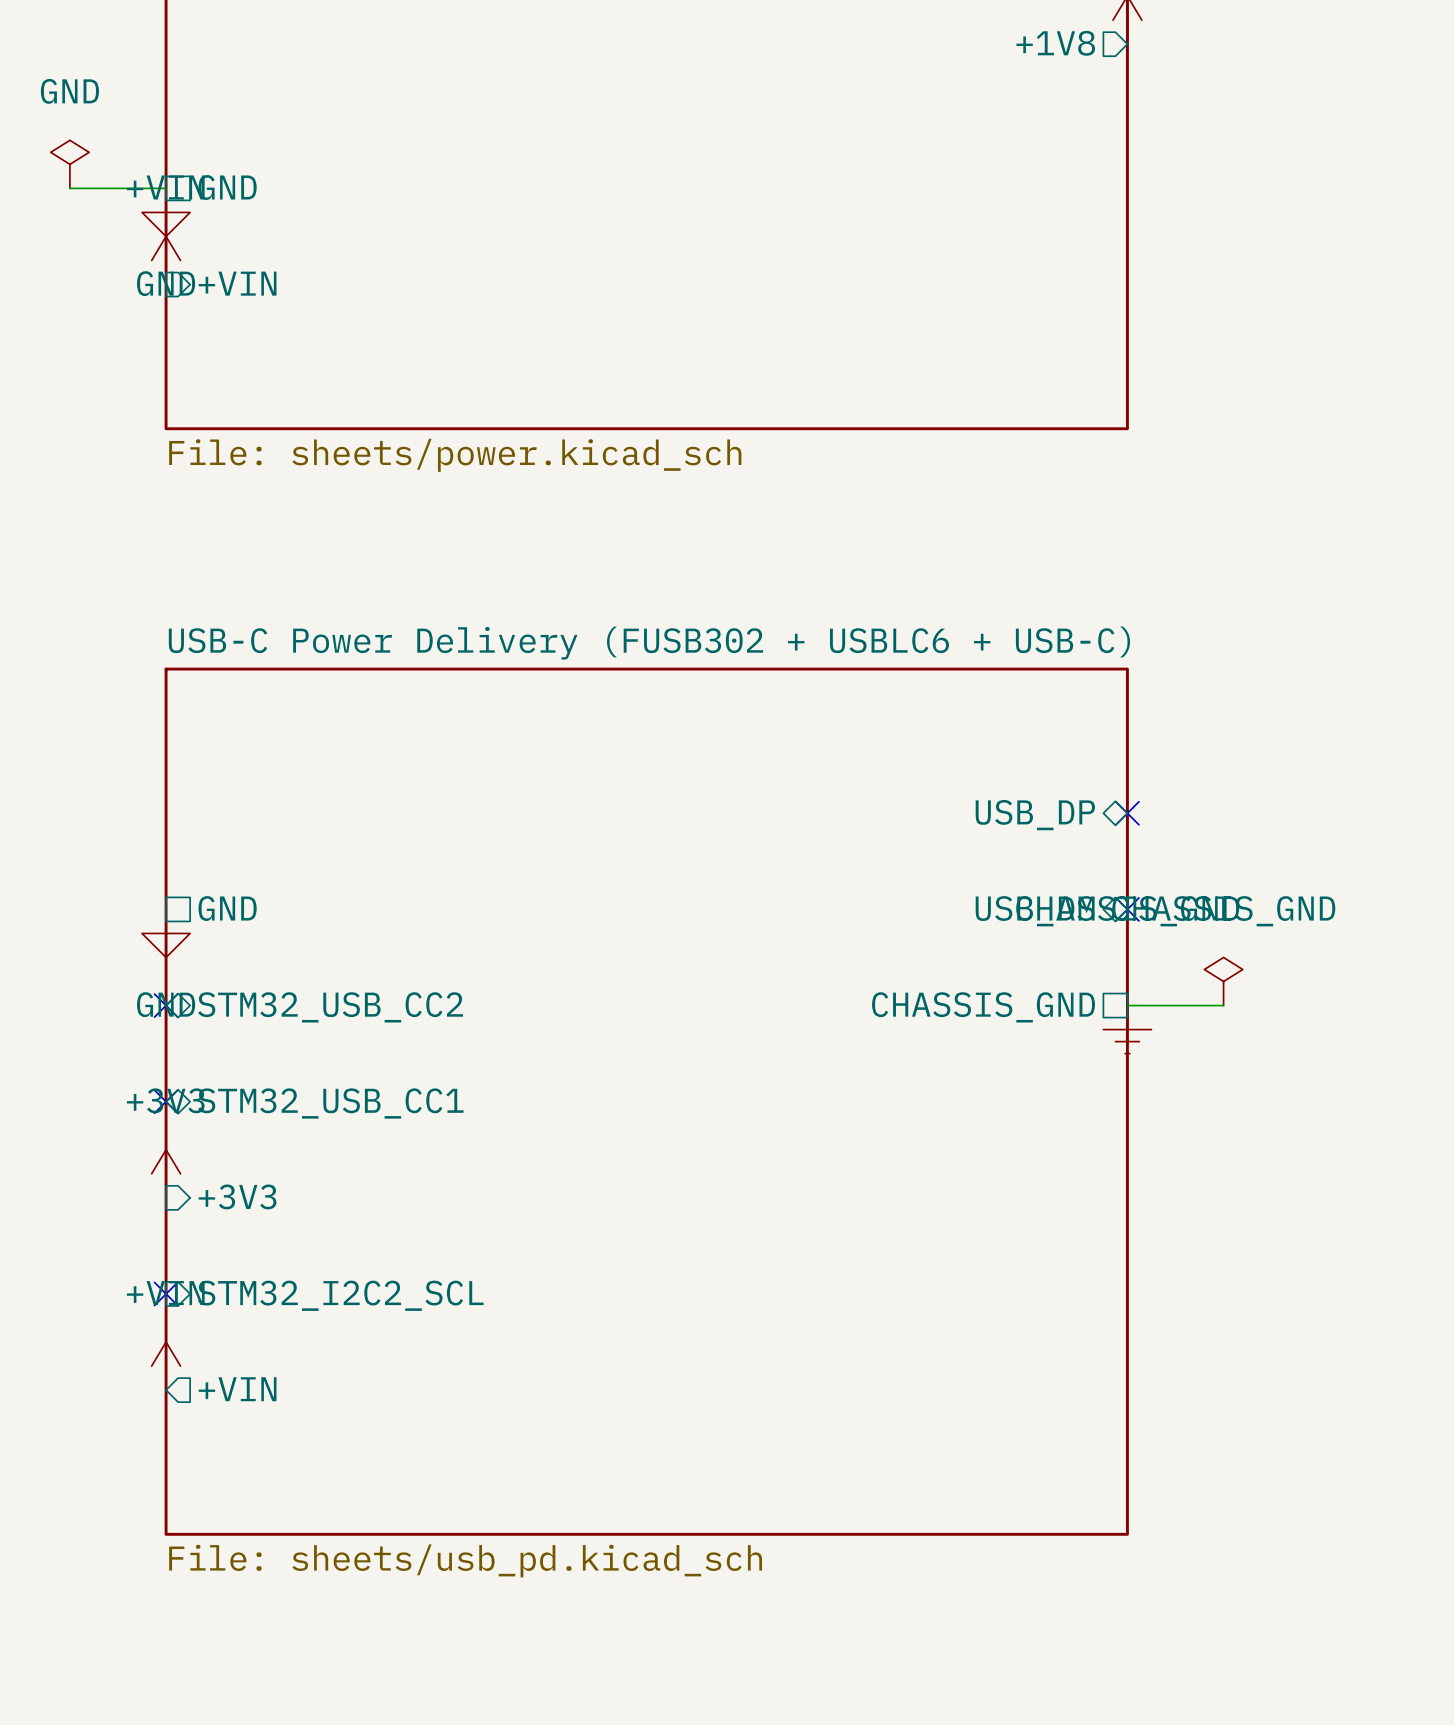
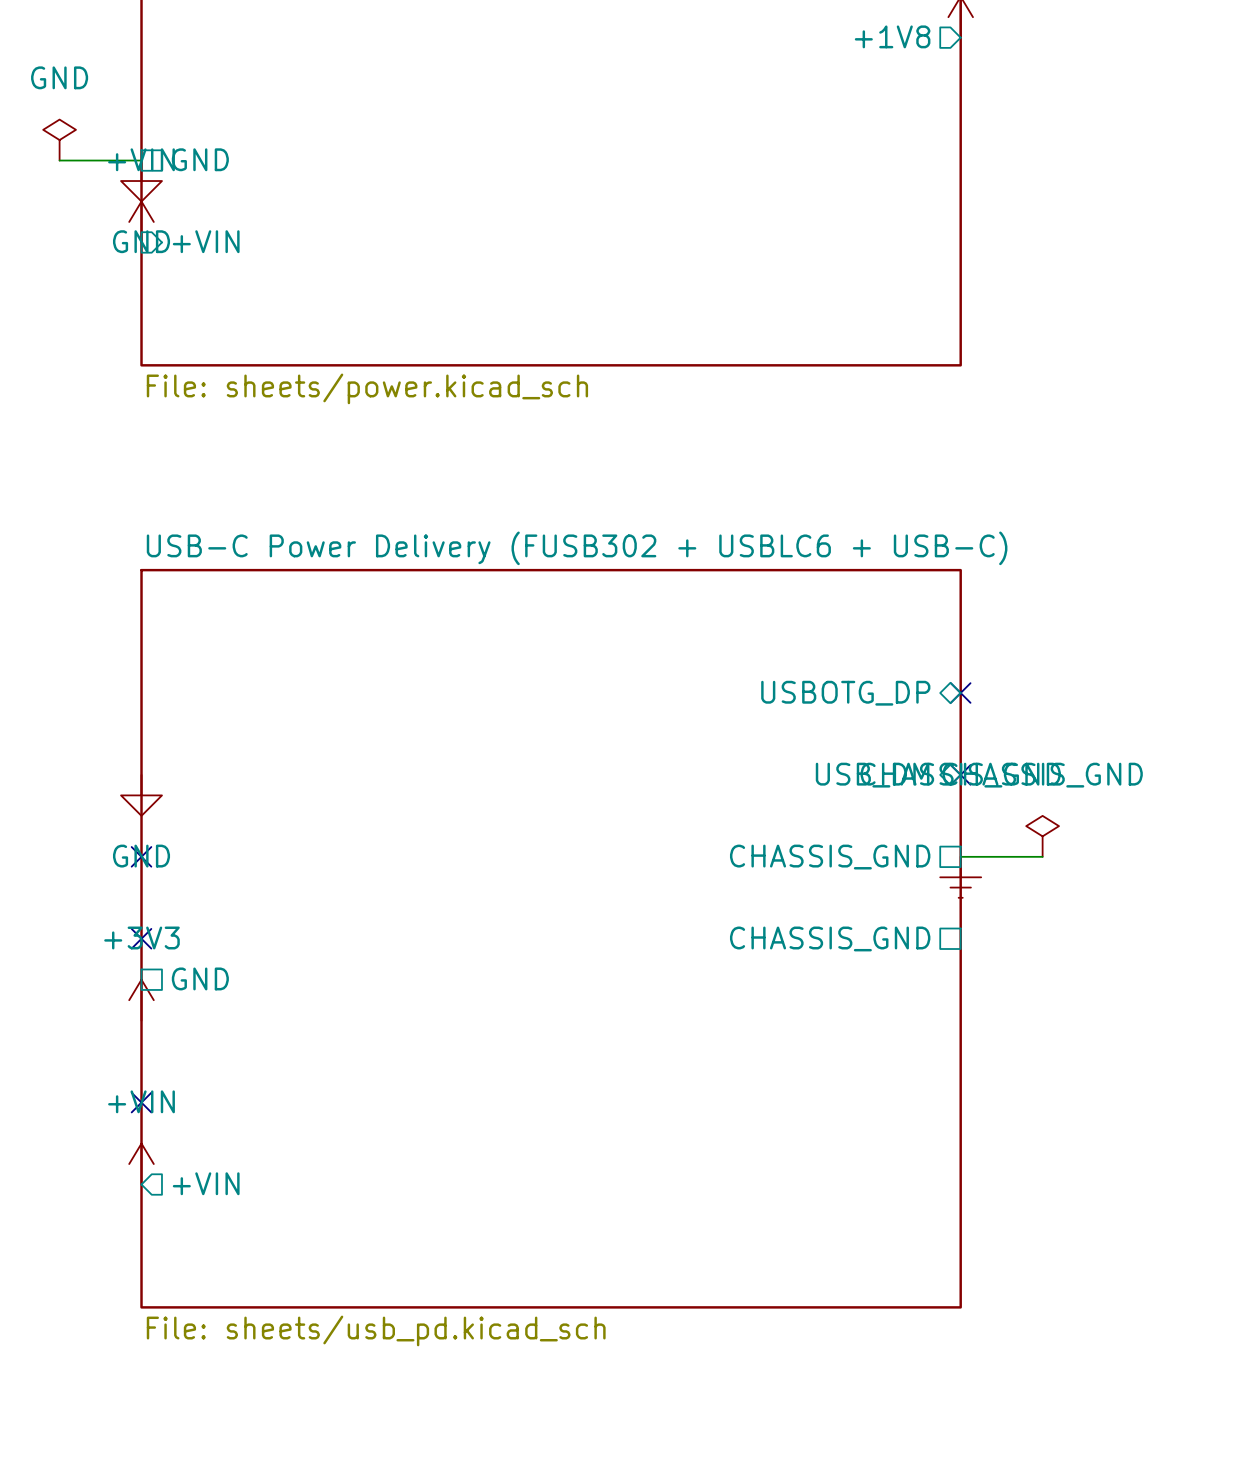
sheet pin: USB_DP (1035, 815) -> USBOTG_DP (845, 693)
sheet pin position: GND (227, 908) -> GND (200, 978)
sheet pin: STM32_USB_CC2 (330, 1007) -> none
sheet pin: STM32_USB_CC1 (330, 1103) -> none
sheet pin: none -> CHASSIS_GND (830, 938)
sheet pin: +3V3 (237, 1196) -> none
sheet pin: STM32_I2C2_SCL (340, 1295) -> none

